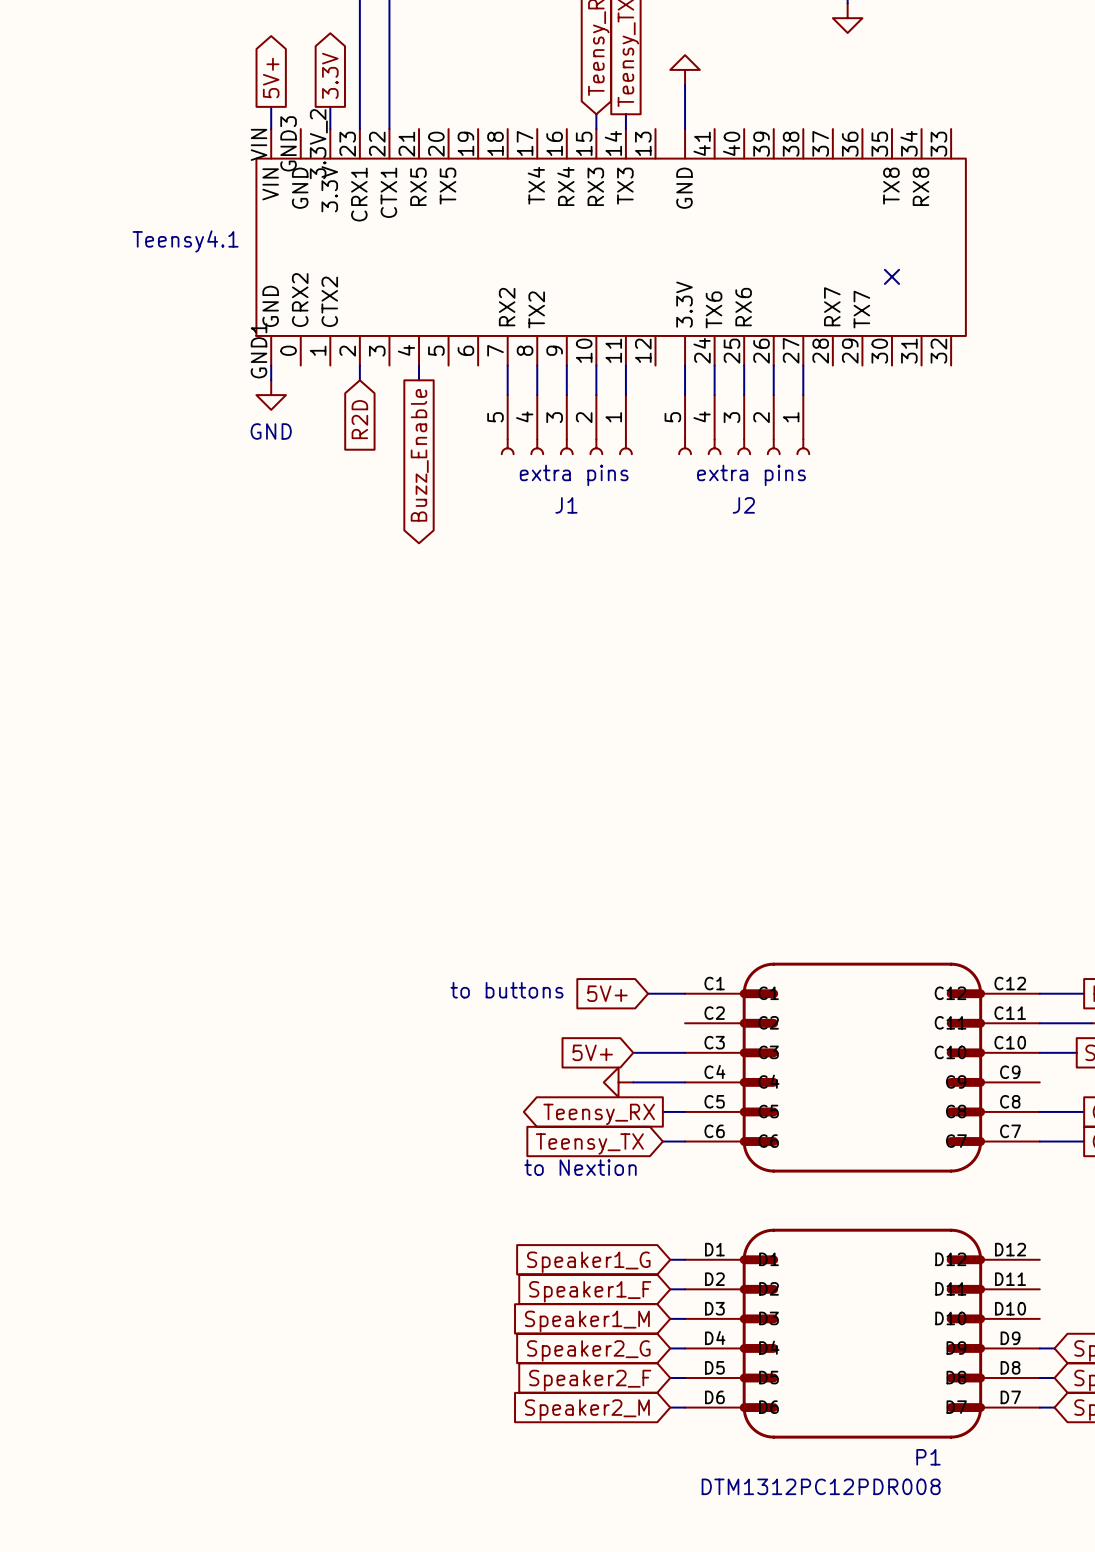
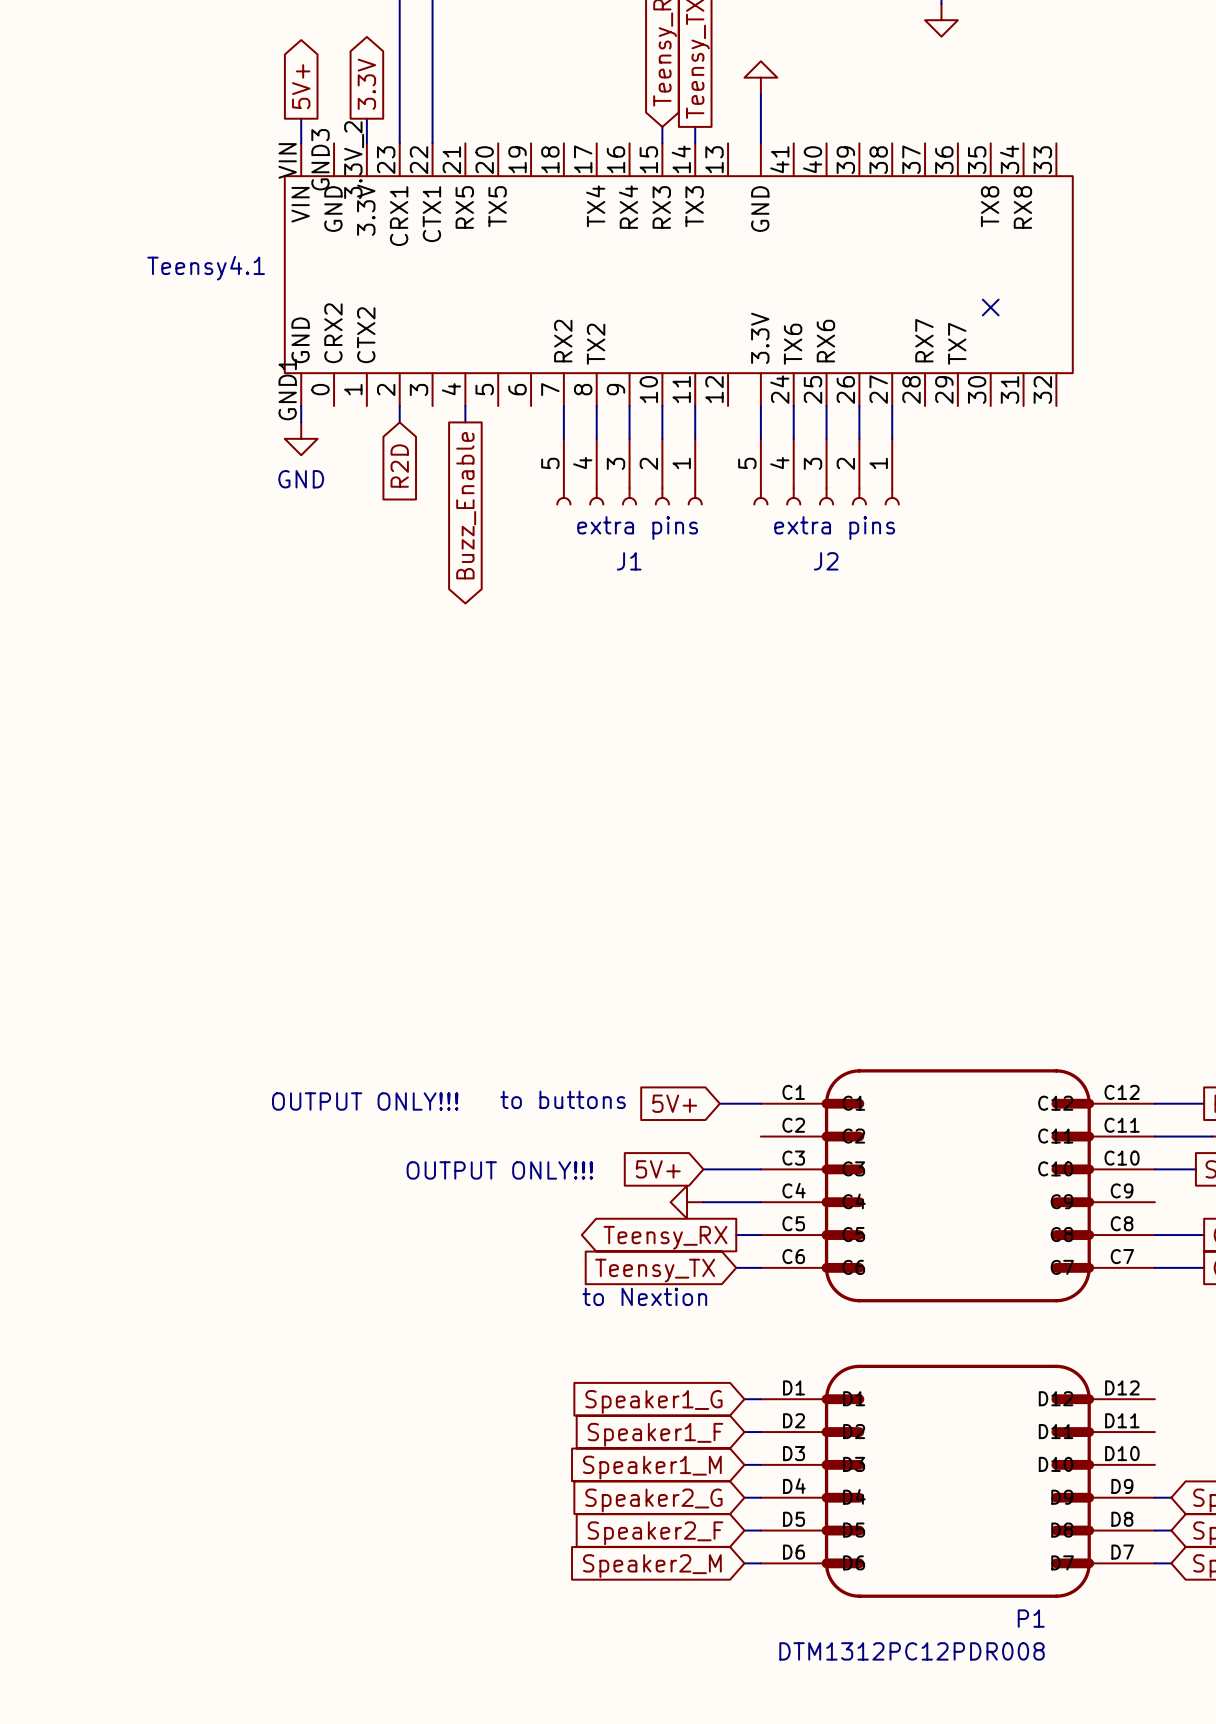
text: none -> OUTPUT ONLY!!! (365, 1101)
text: none -> OUTPUT ONLY!!! (499, 1170)

